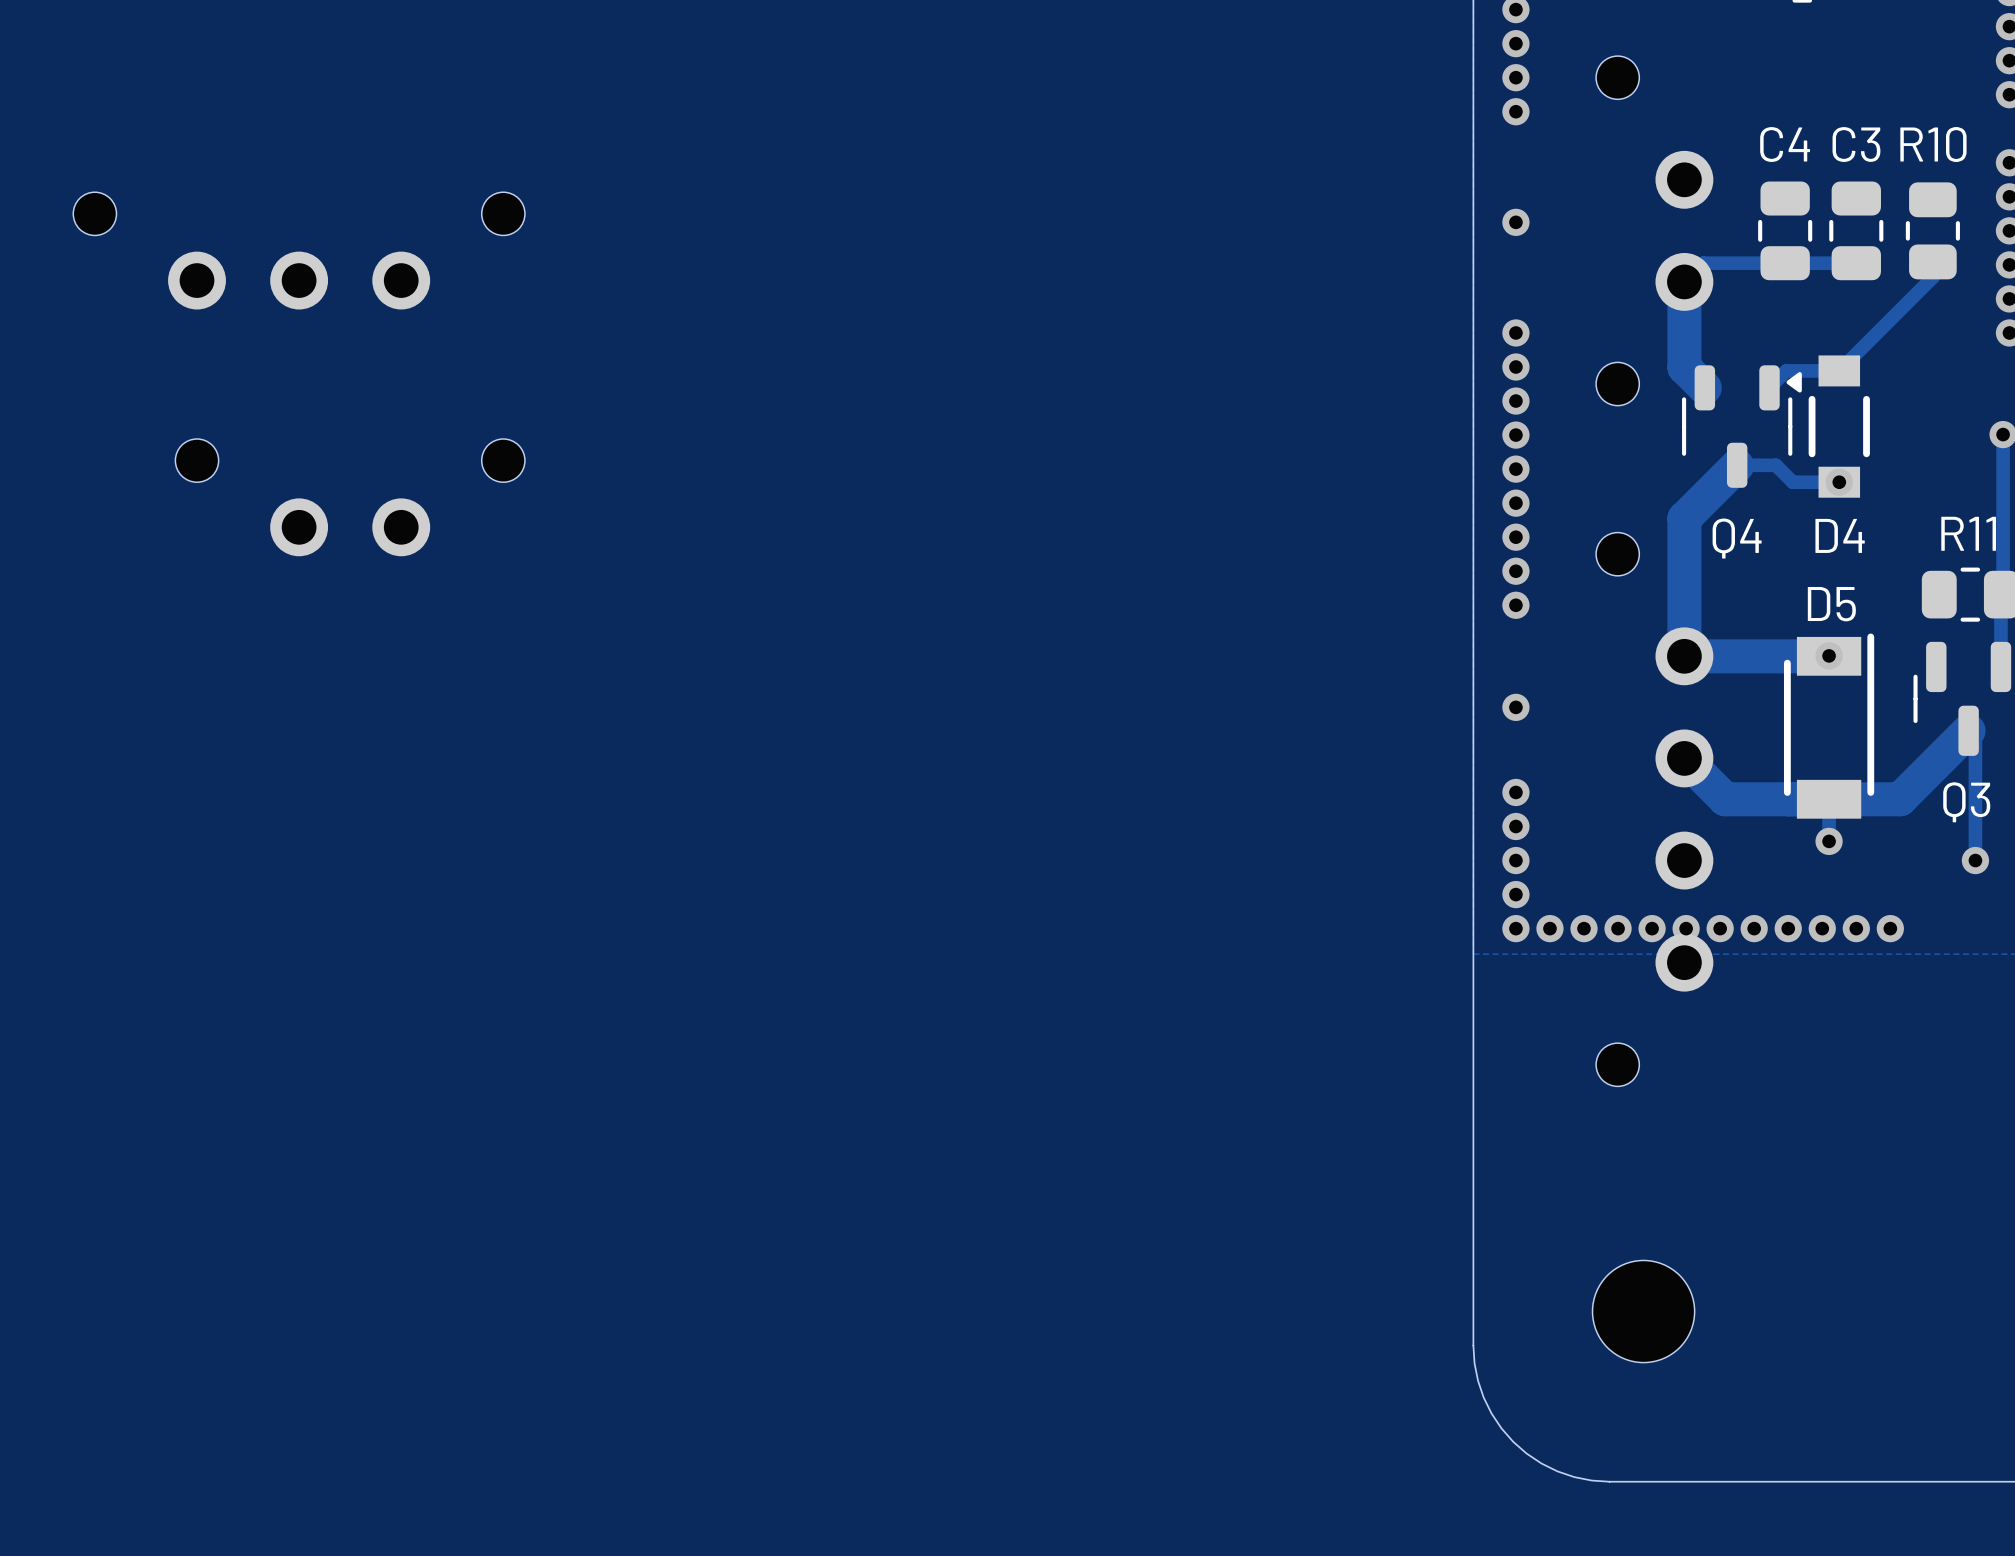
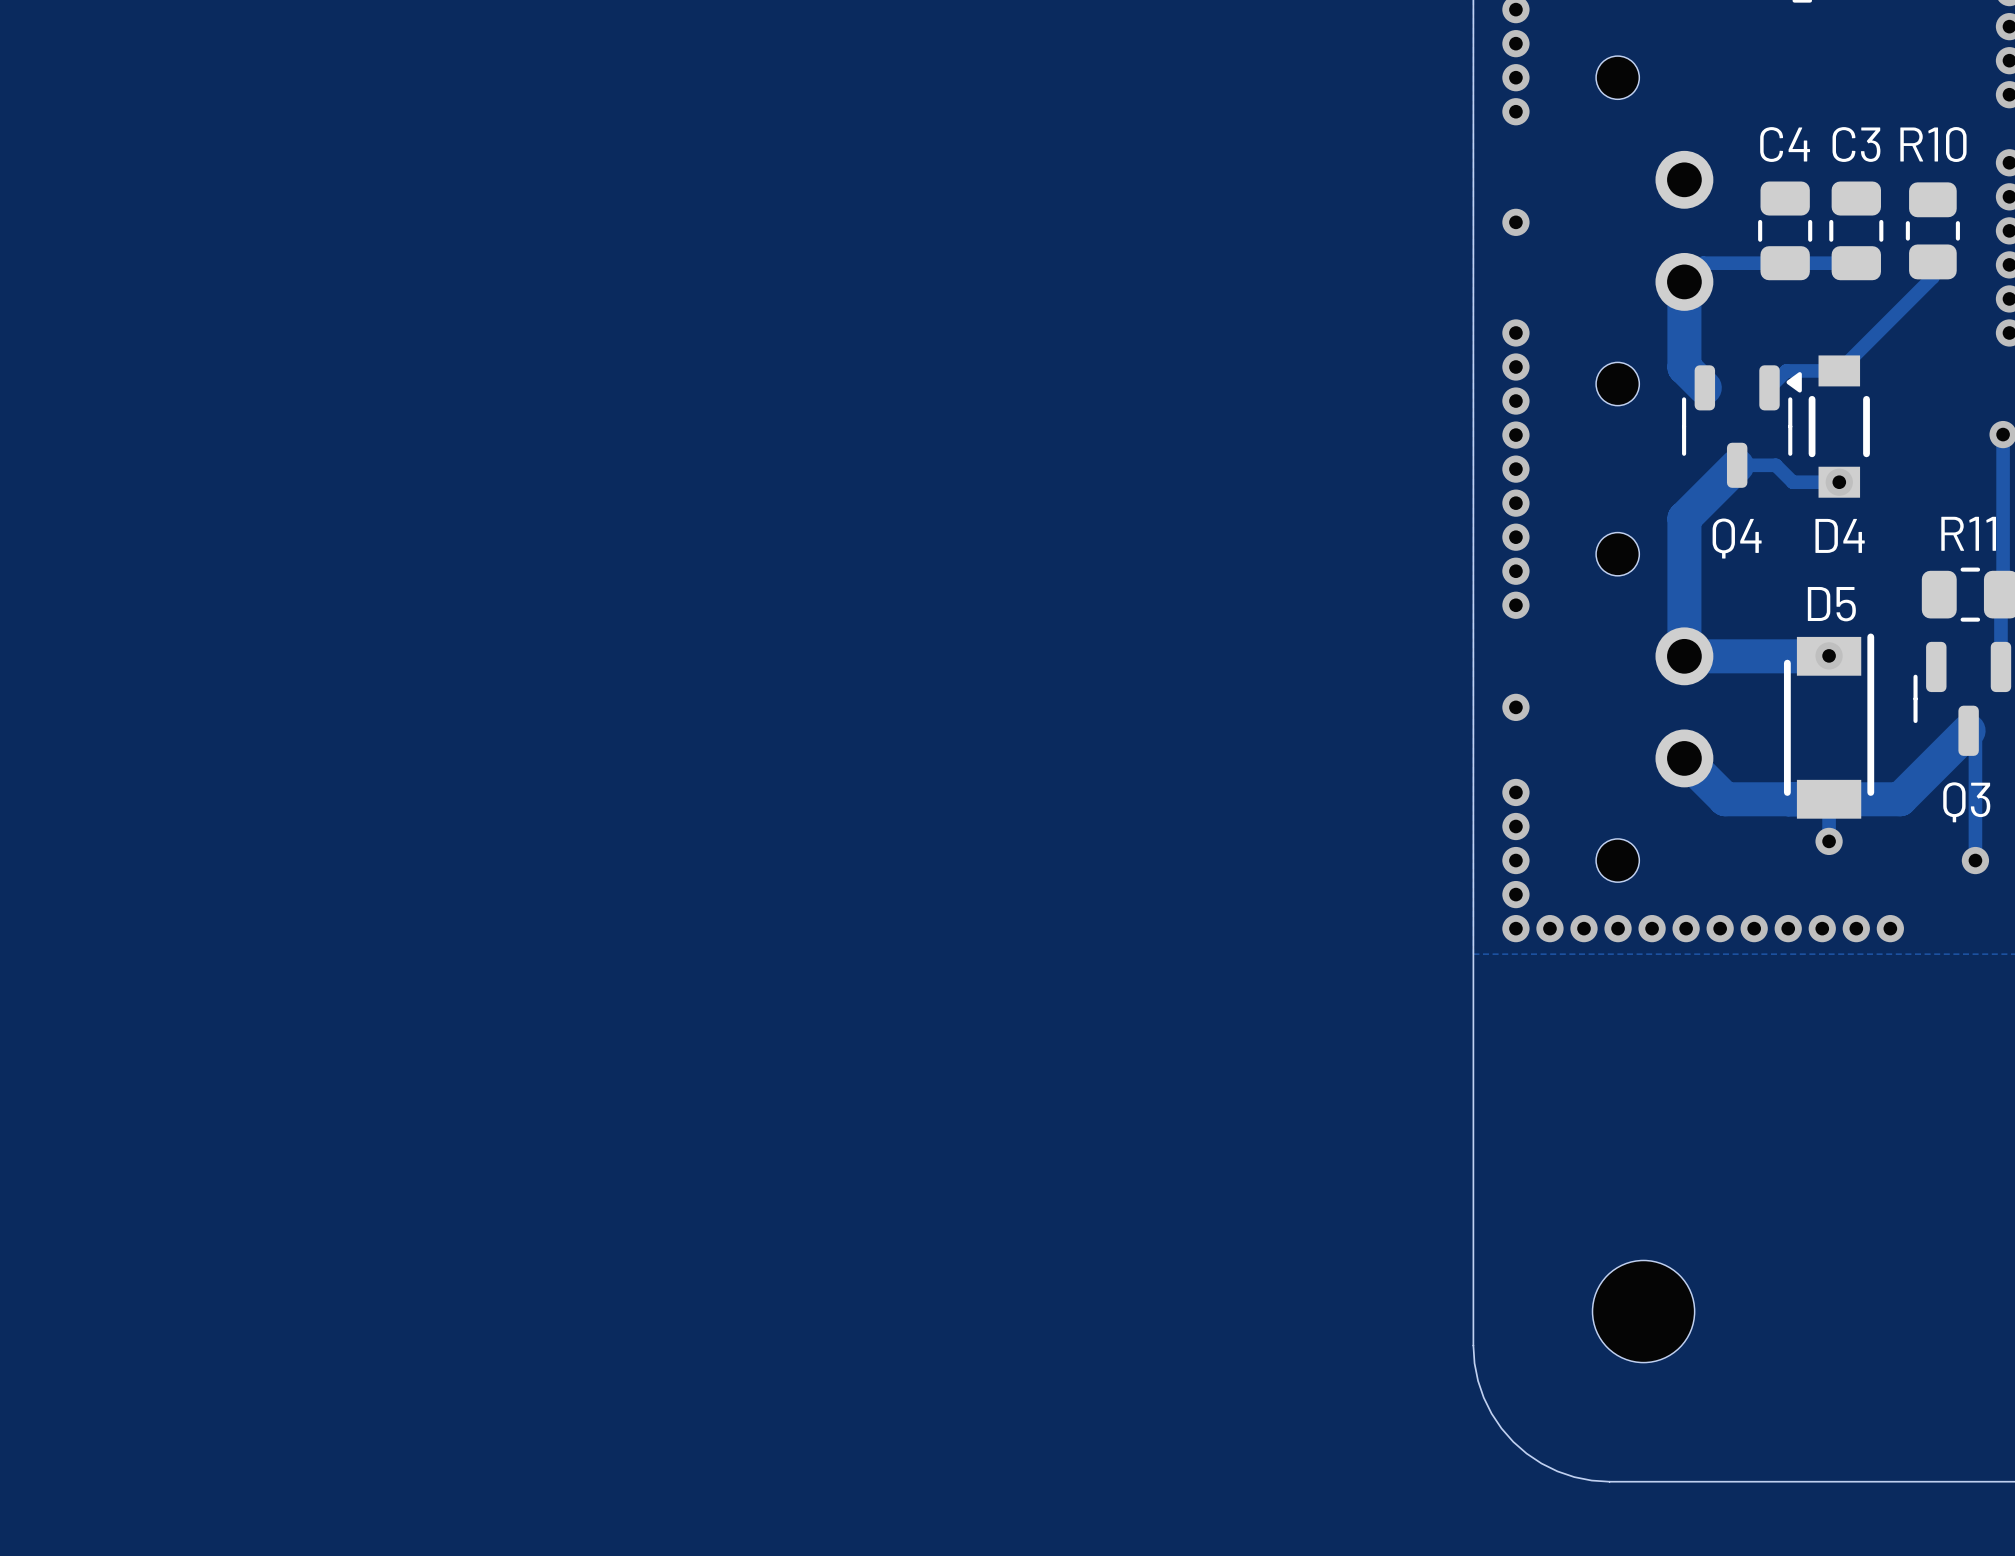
part: (299, 250) -> none
part: (350, 497) -> none
part: none -> (1654, 707)
part: (1654, 809) -> none

